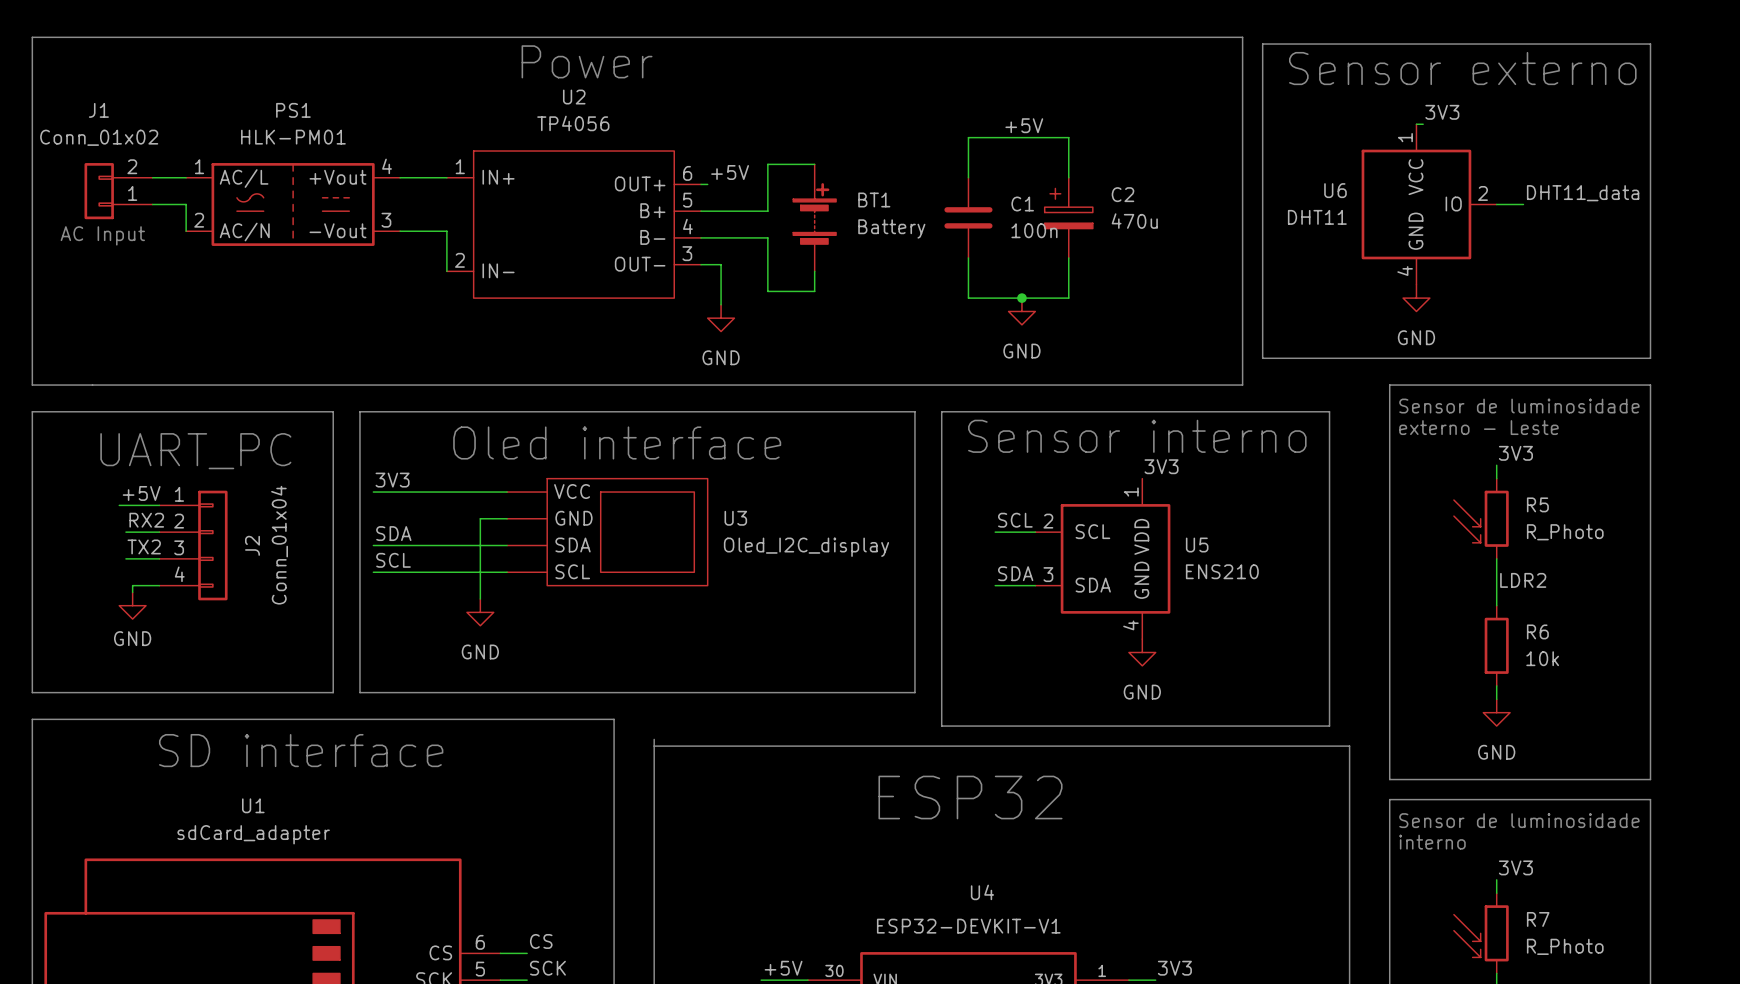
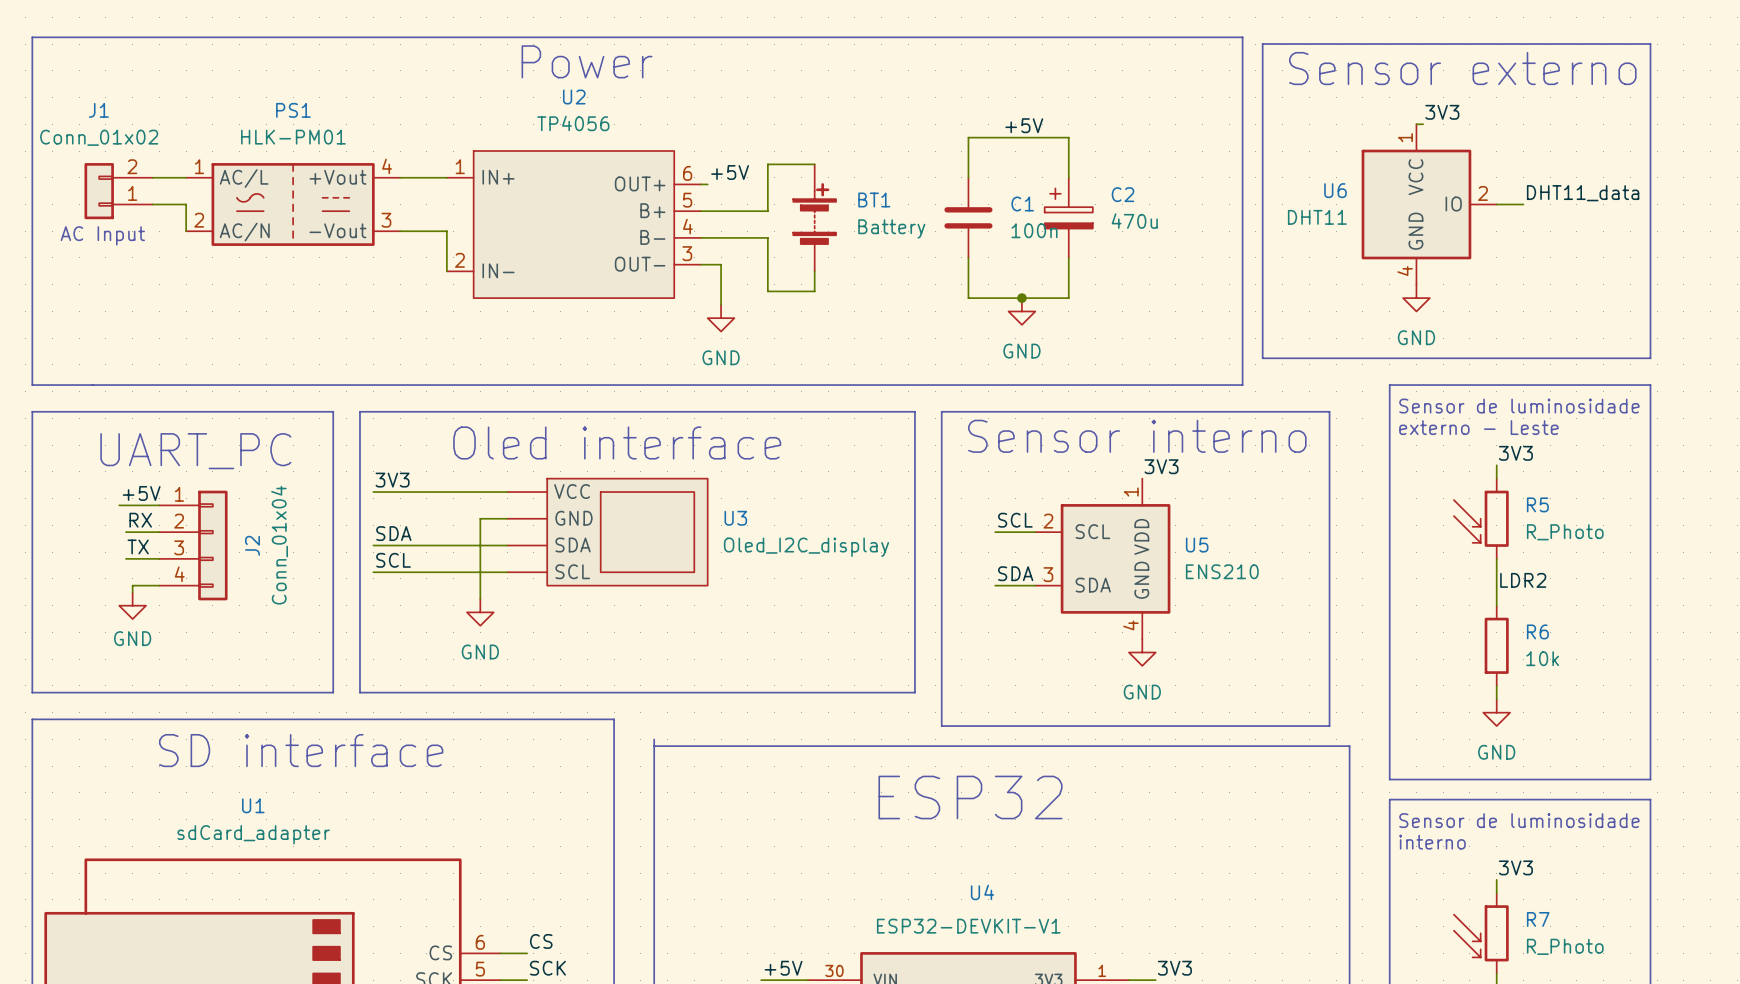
label: RX2 (146, 520) -> RX (140, 520)
label: TX2 (144, 546) -> TX (138, 546)

